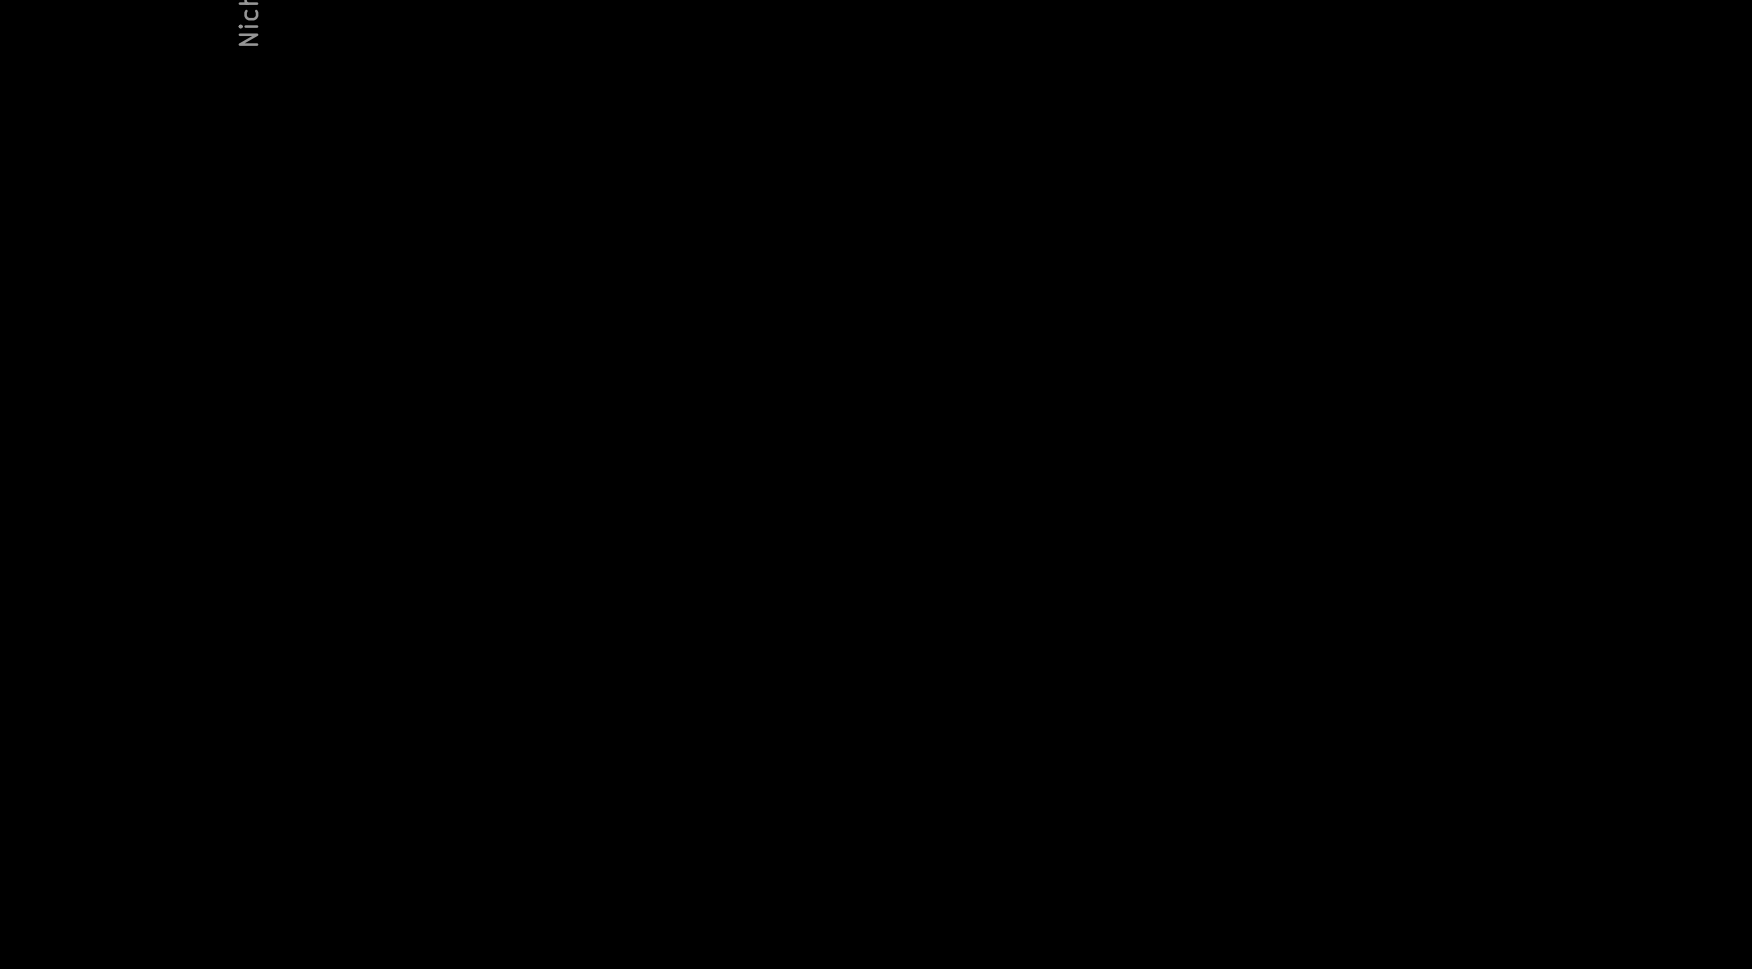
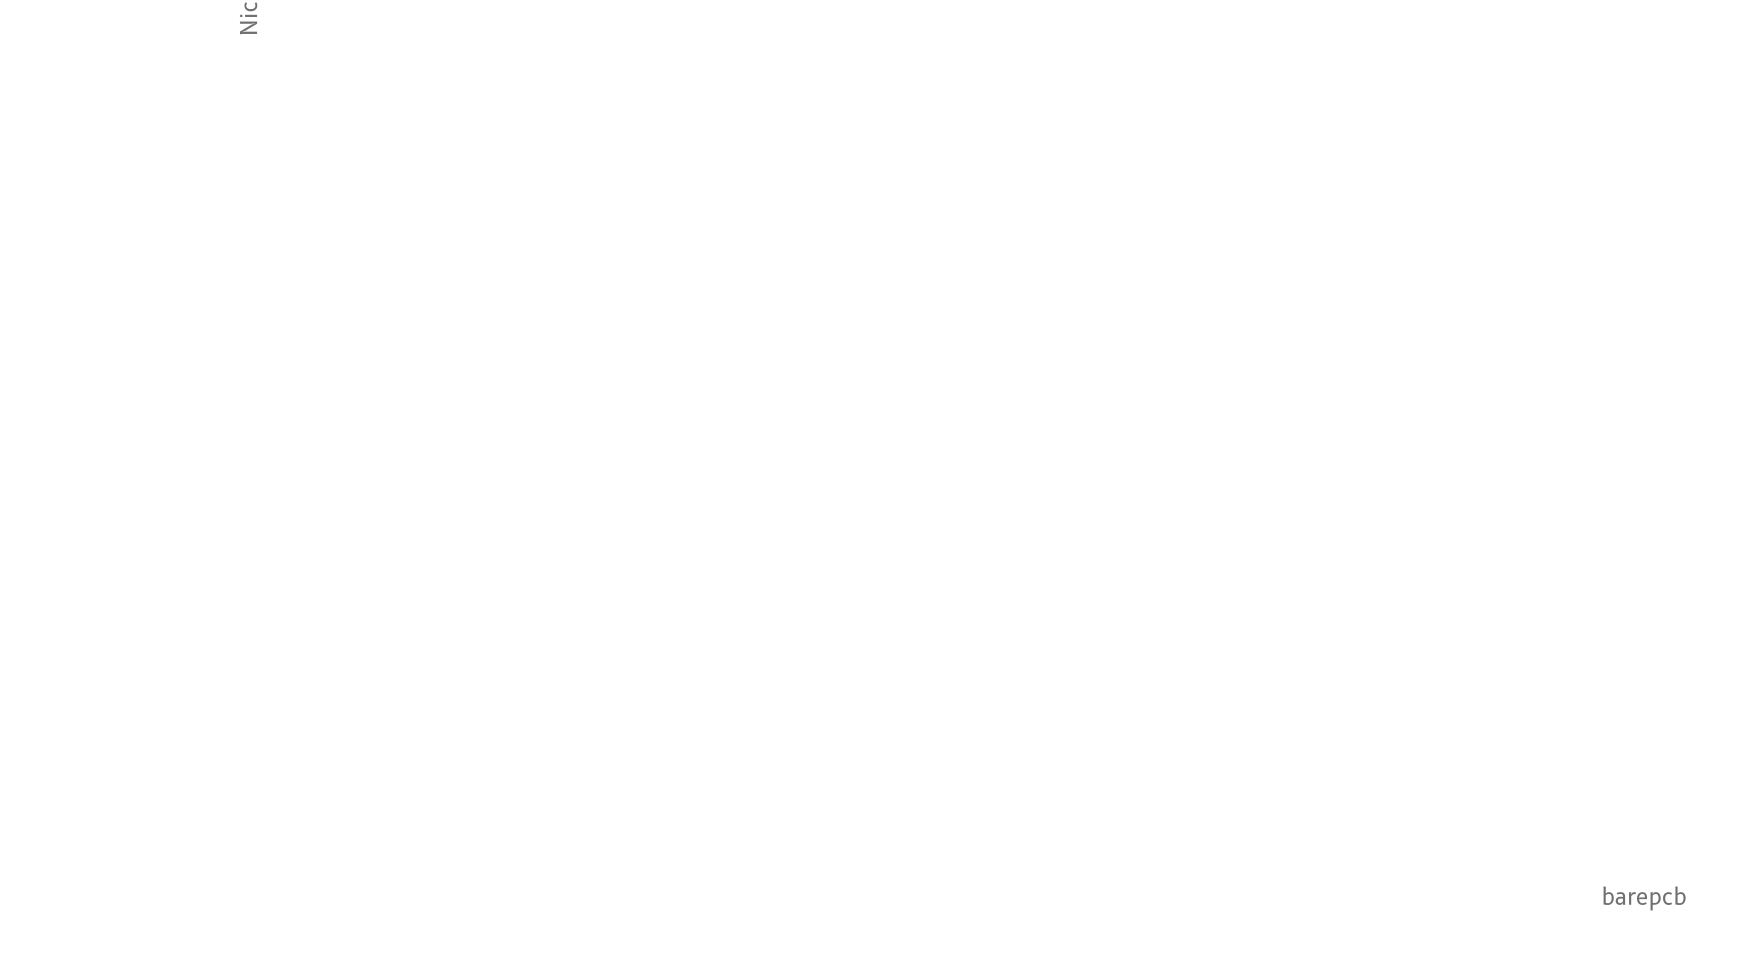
drawing: none -> [1603, 886, 1686, 911]

